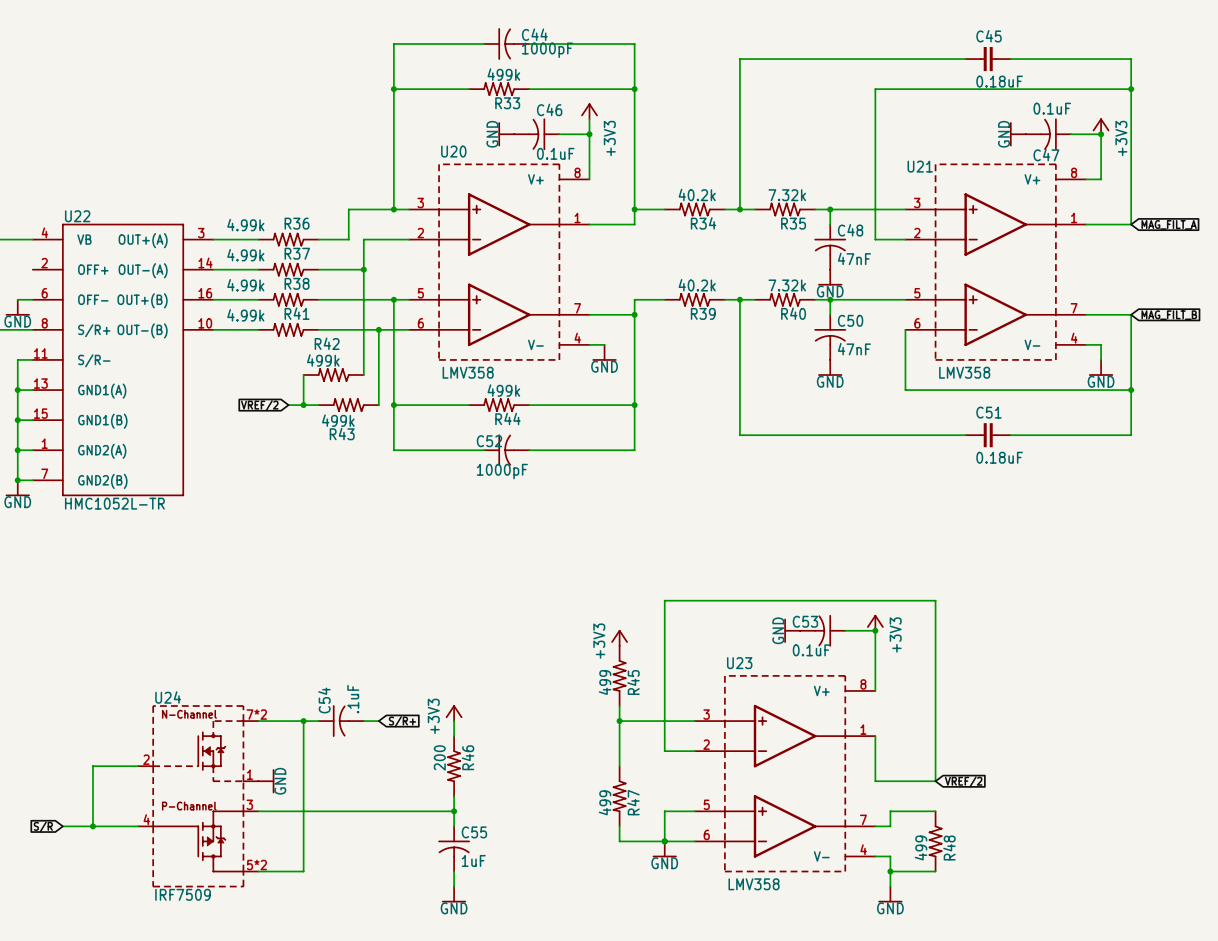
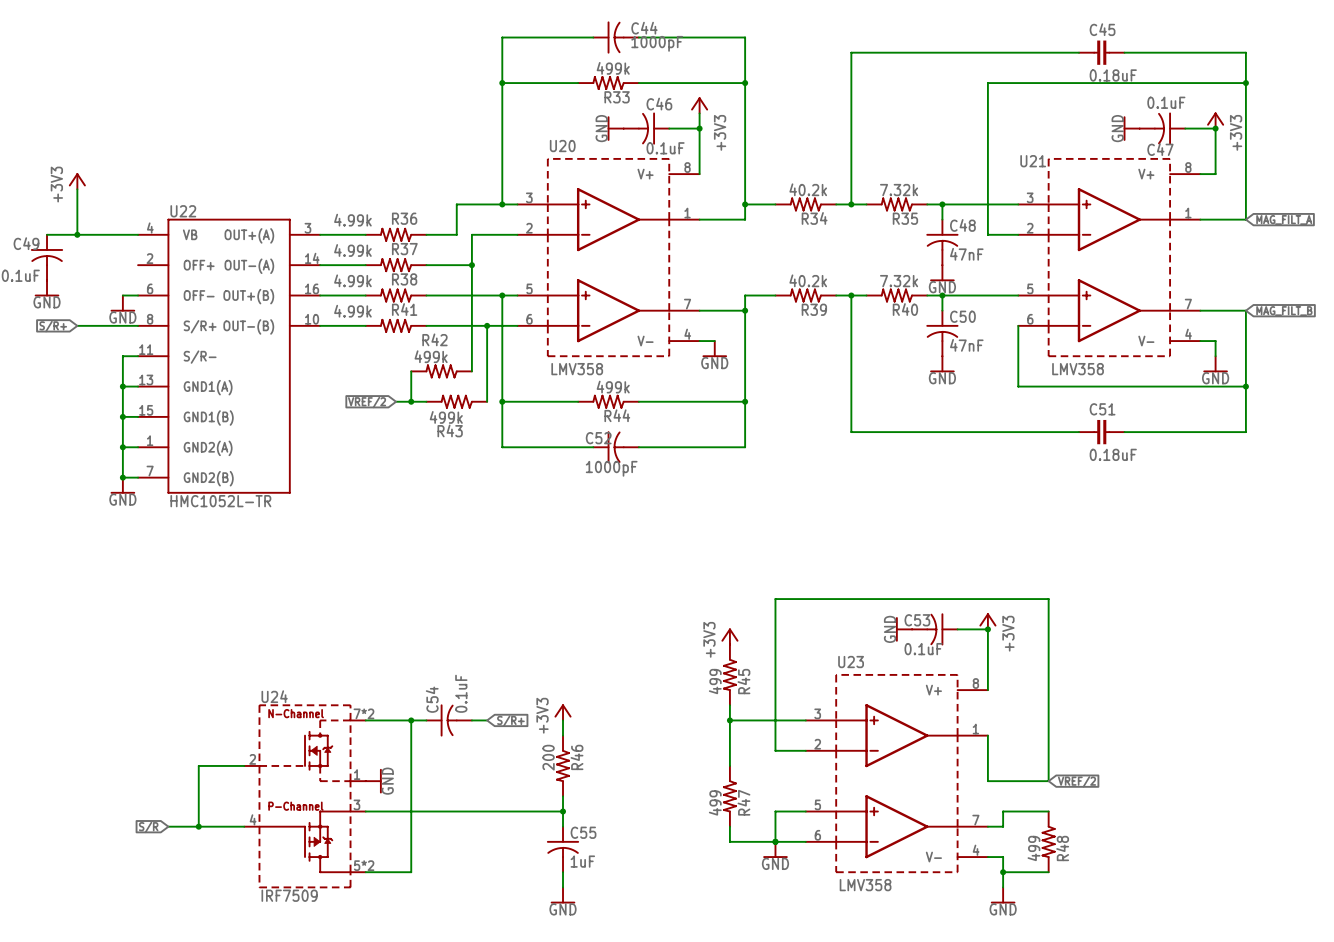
C54 value: .1uF (353, 699) -> 0.1uF (461, 693)

